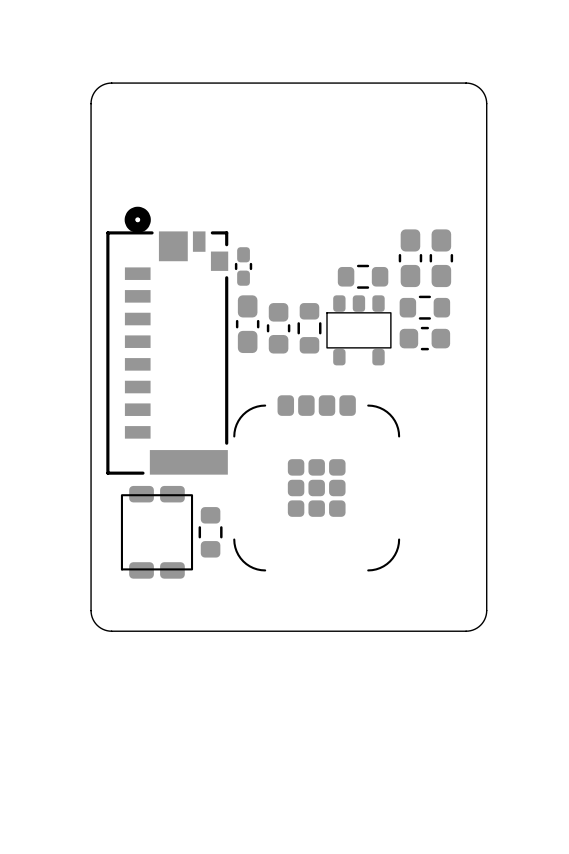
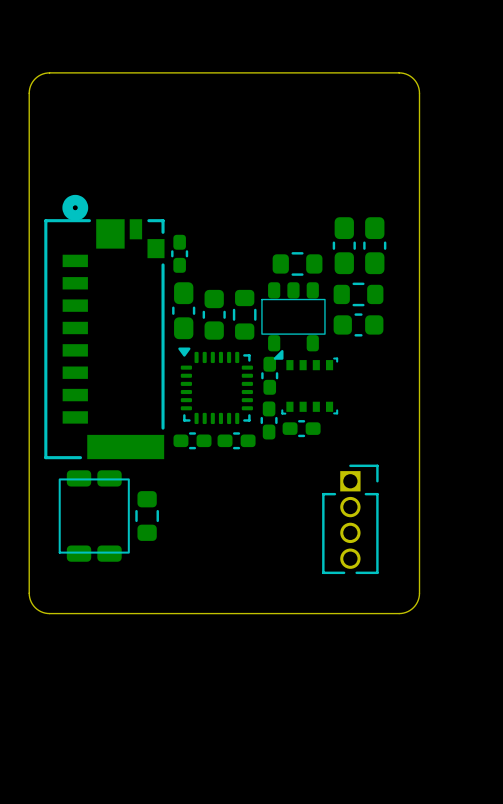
part: none -> (269, 375)
part: none -> (305, 382)
part: none -> (215, 385)
part: none -> (269, 420)
part: none -> (301, 428)
part: none -> (192, 440)
part: none -> (236, 440)
part: (316, 483) -> none
part: none -> (350, 519)

